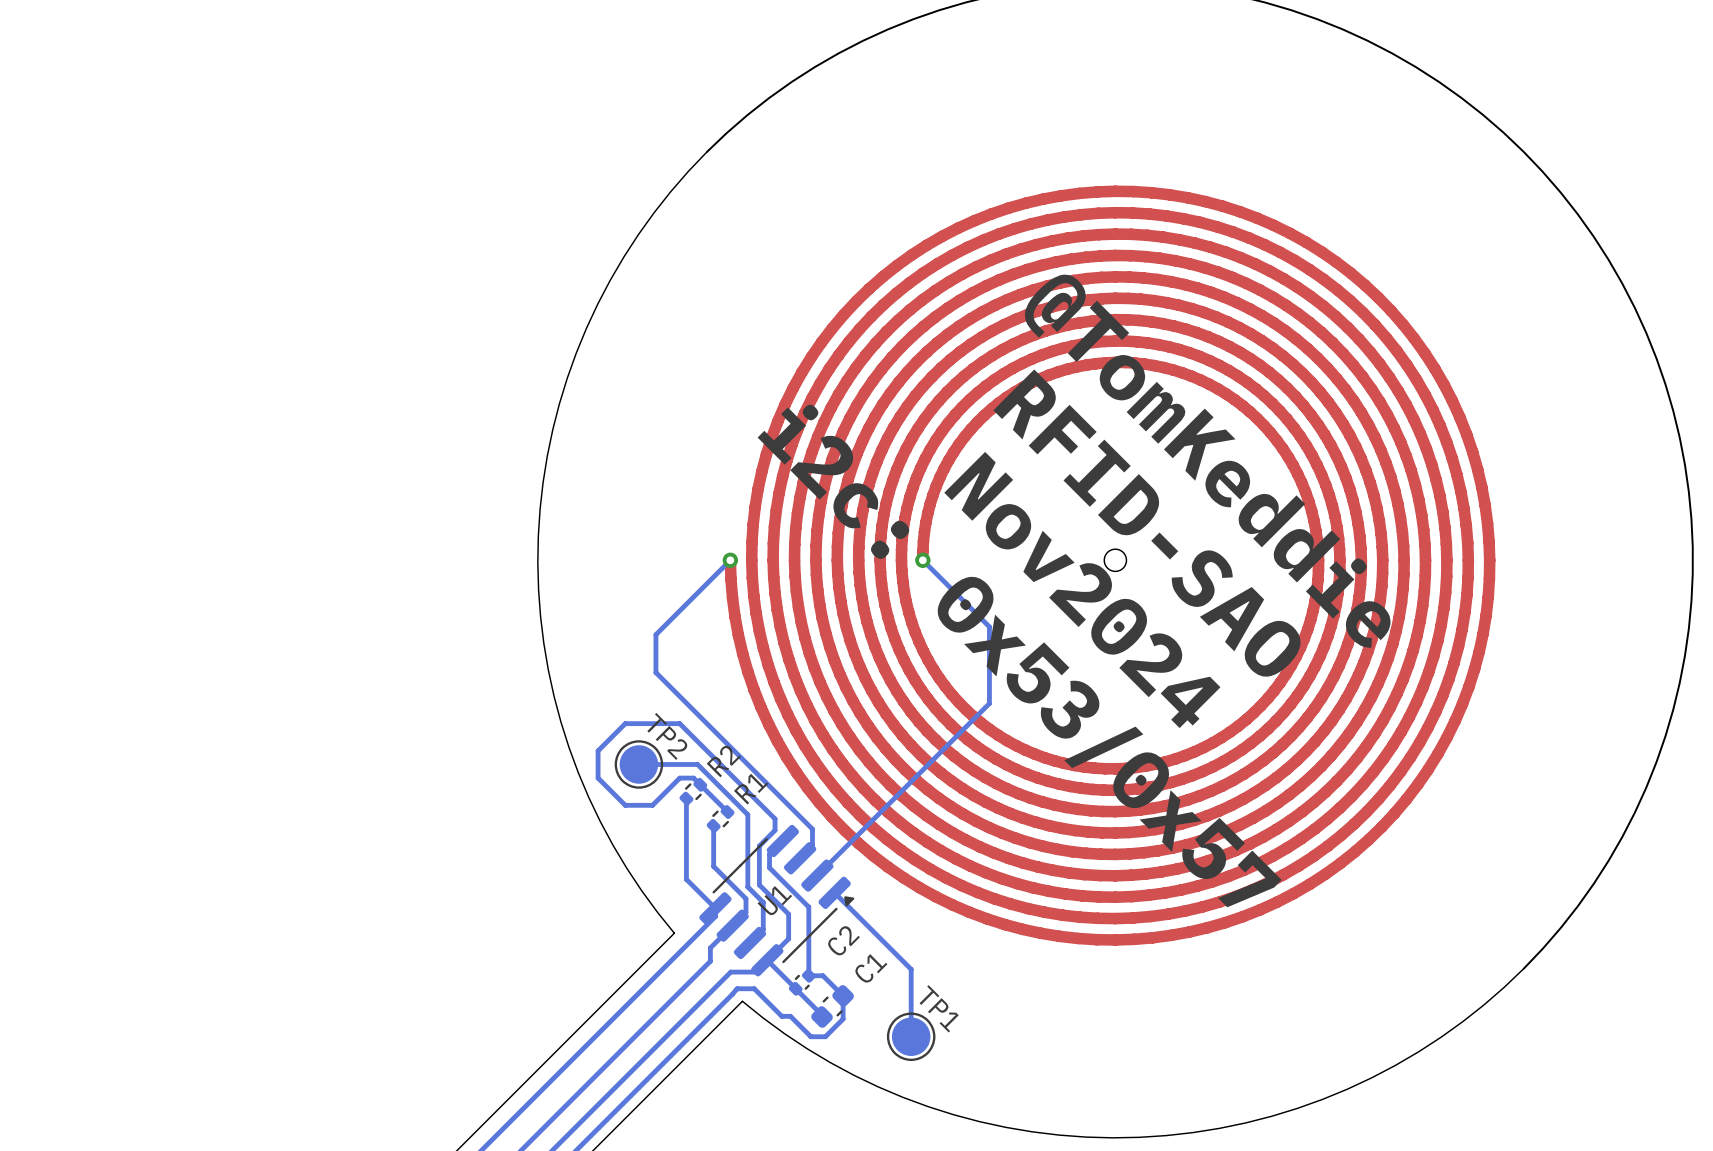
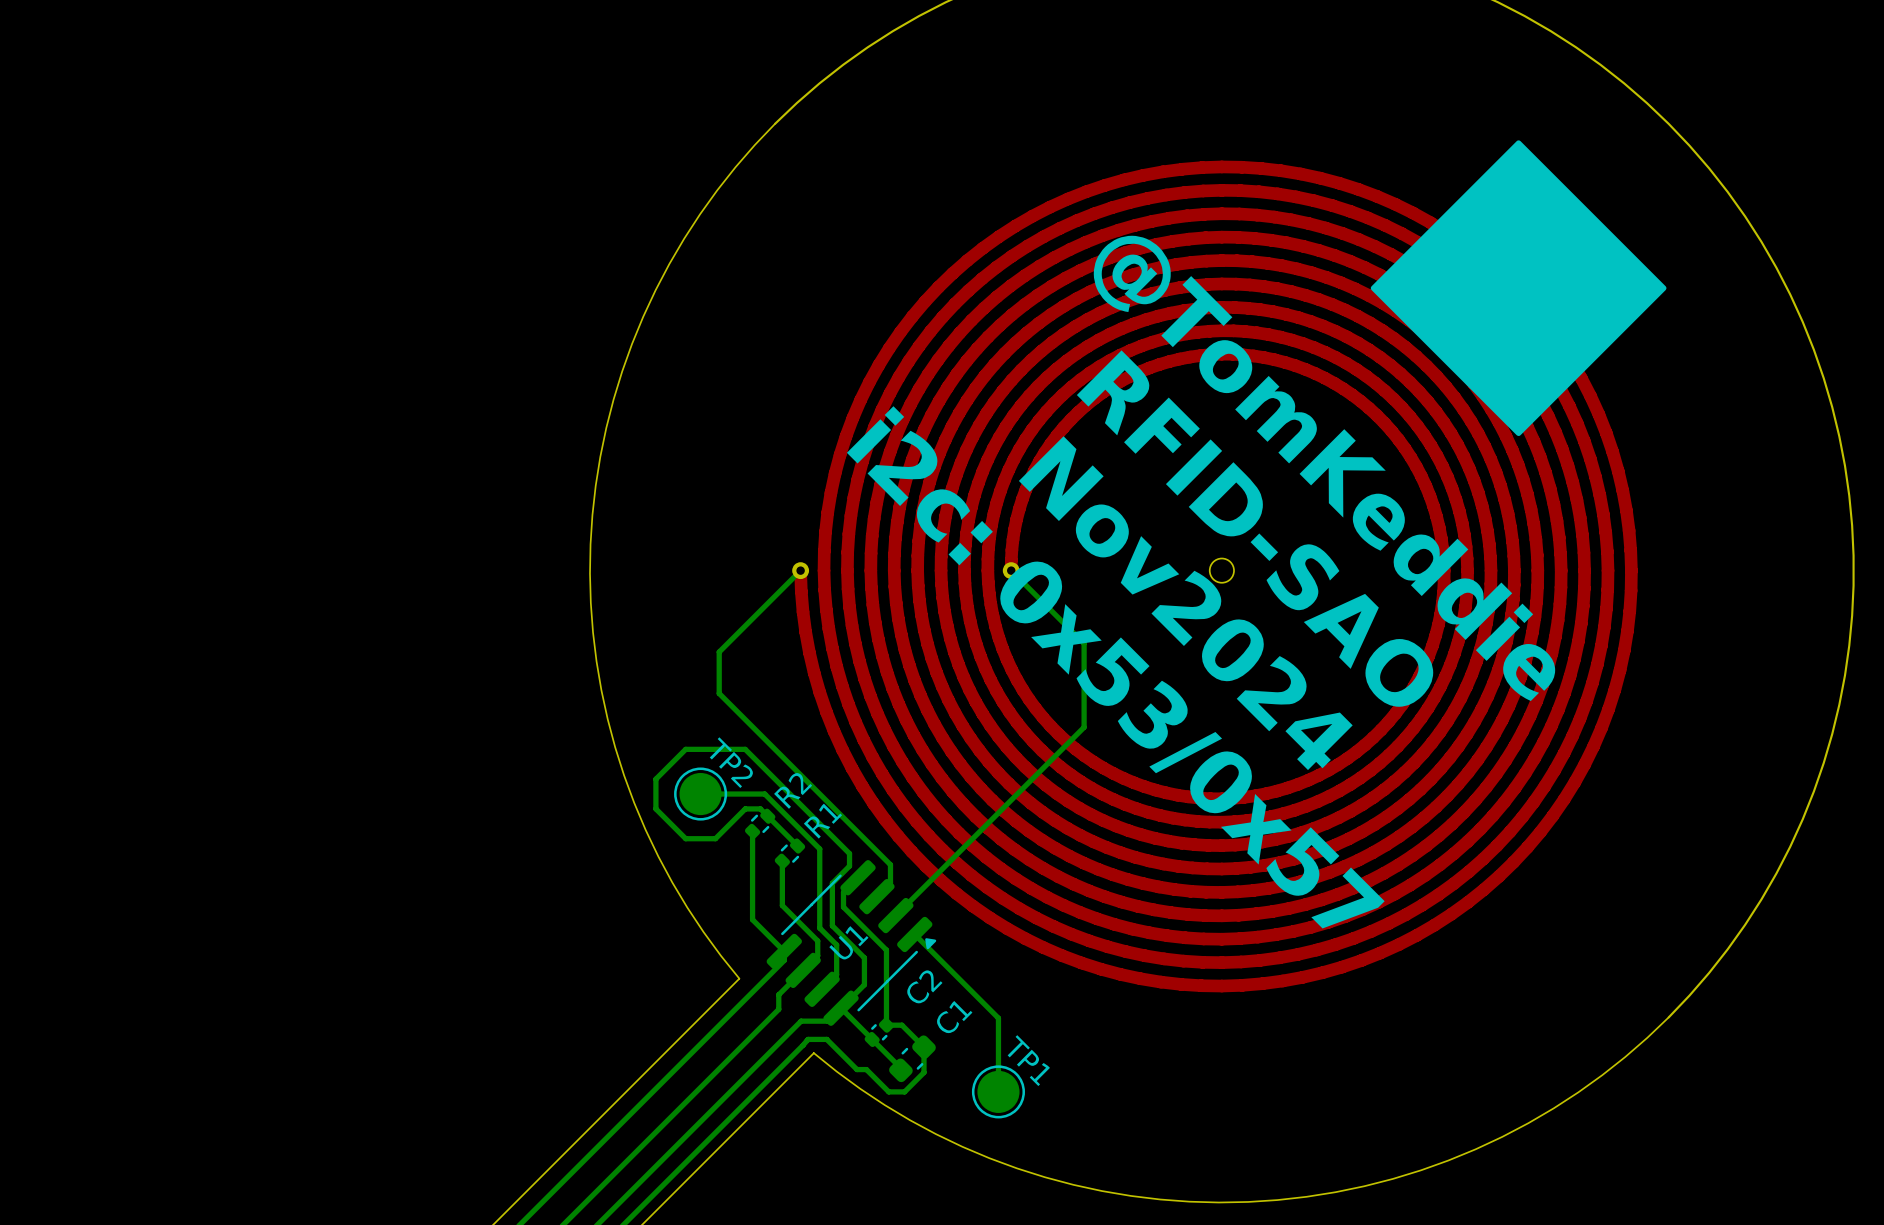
drawing: none -> [1370, 140, 1667, 436]

